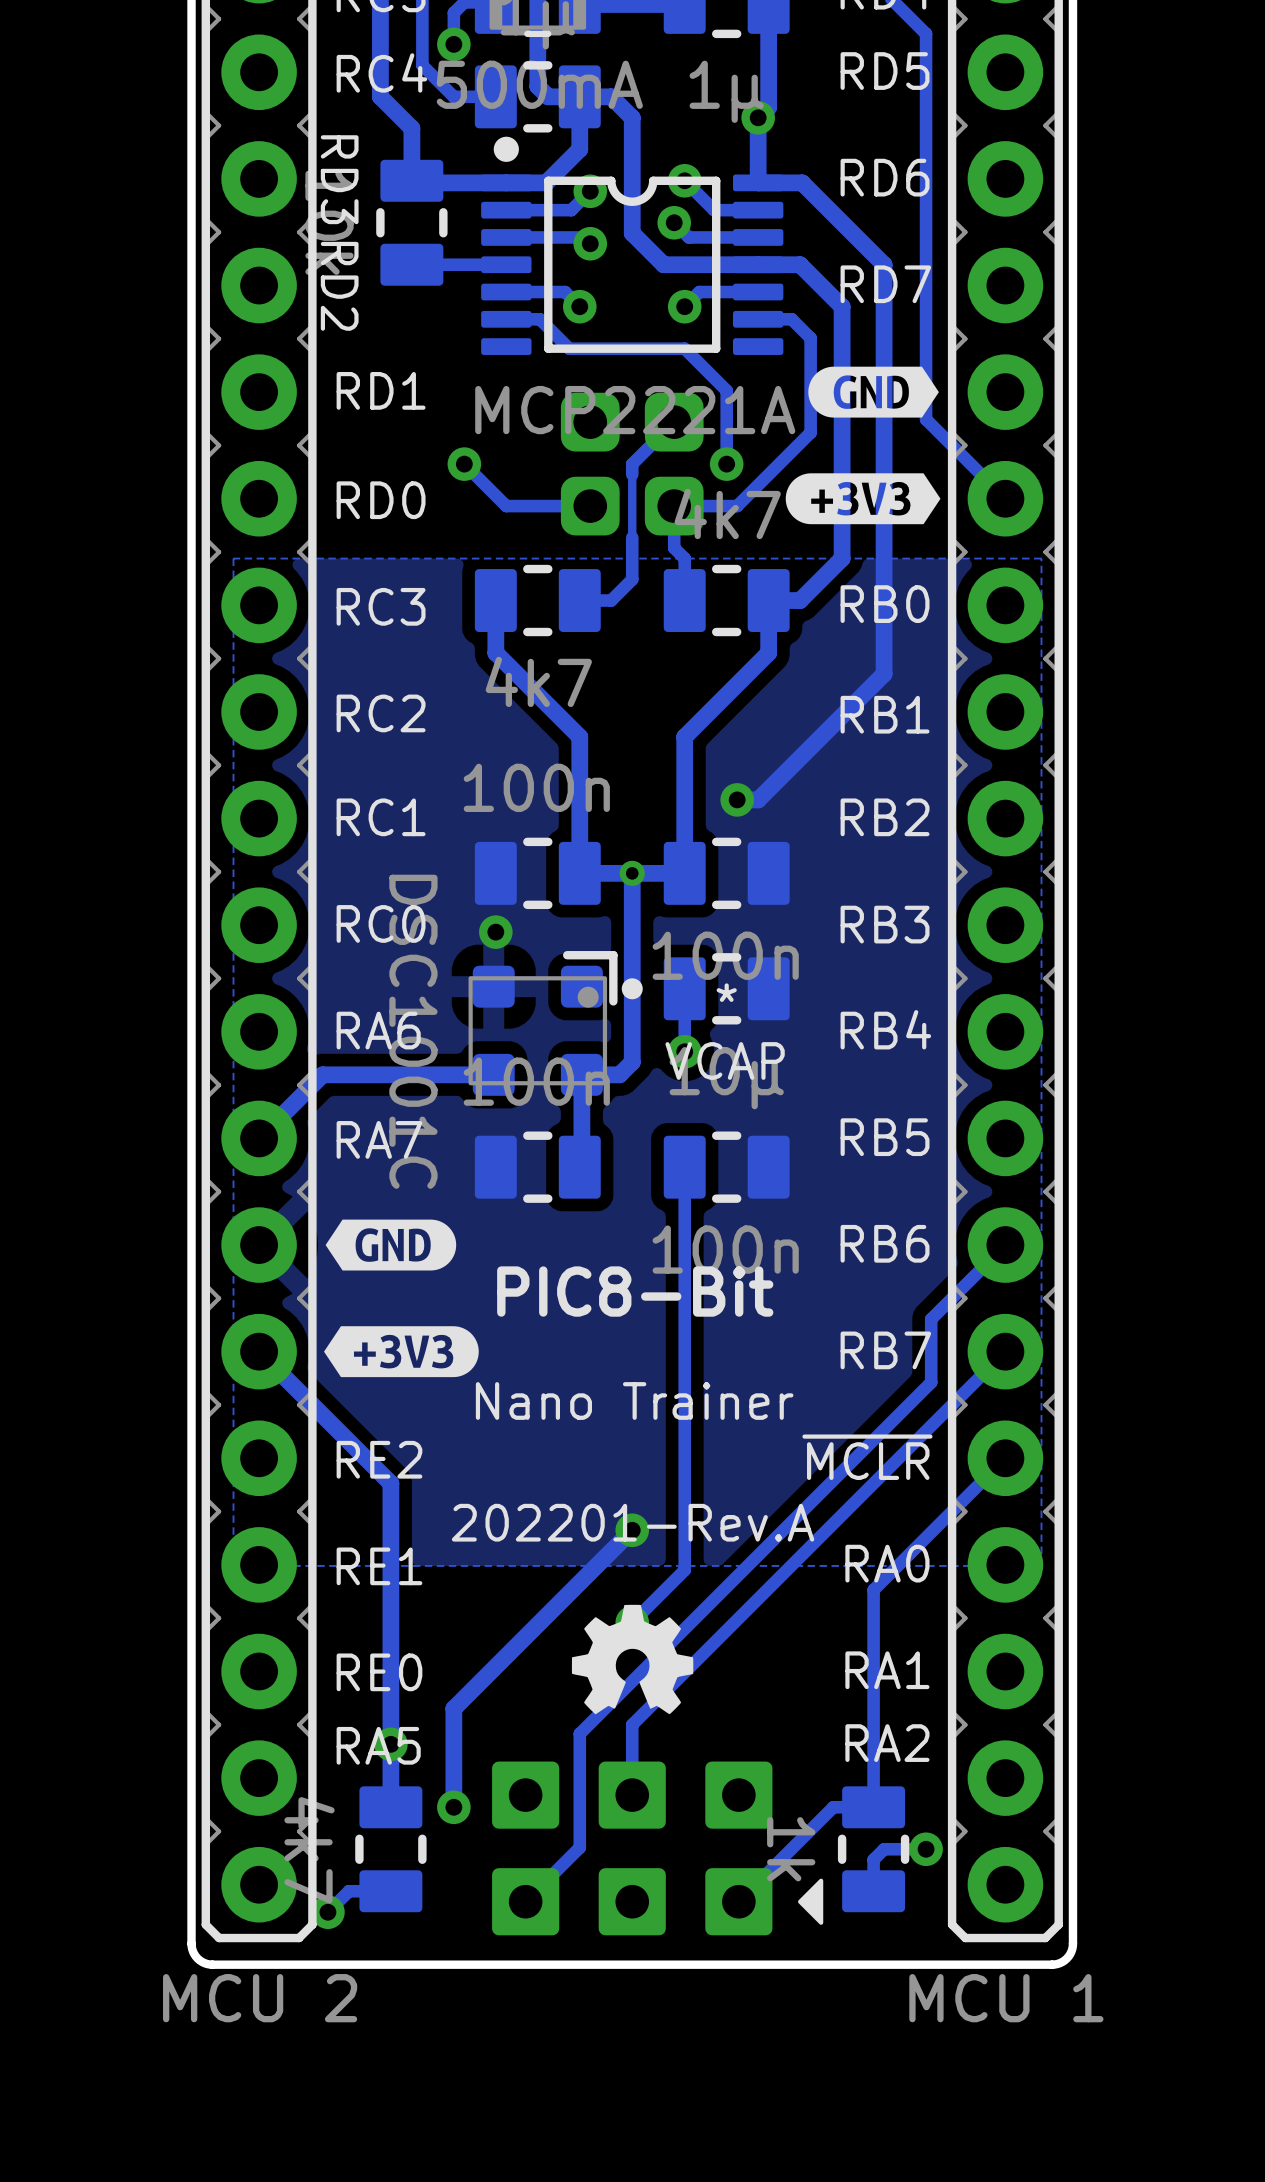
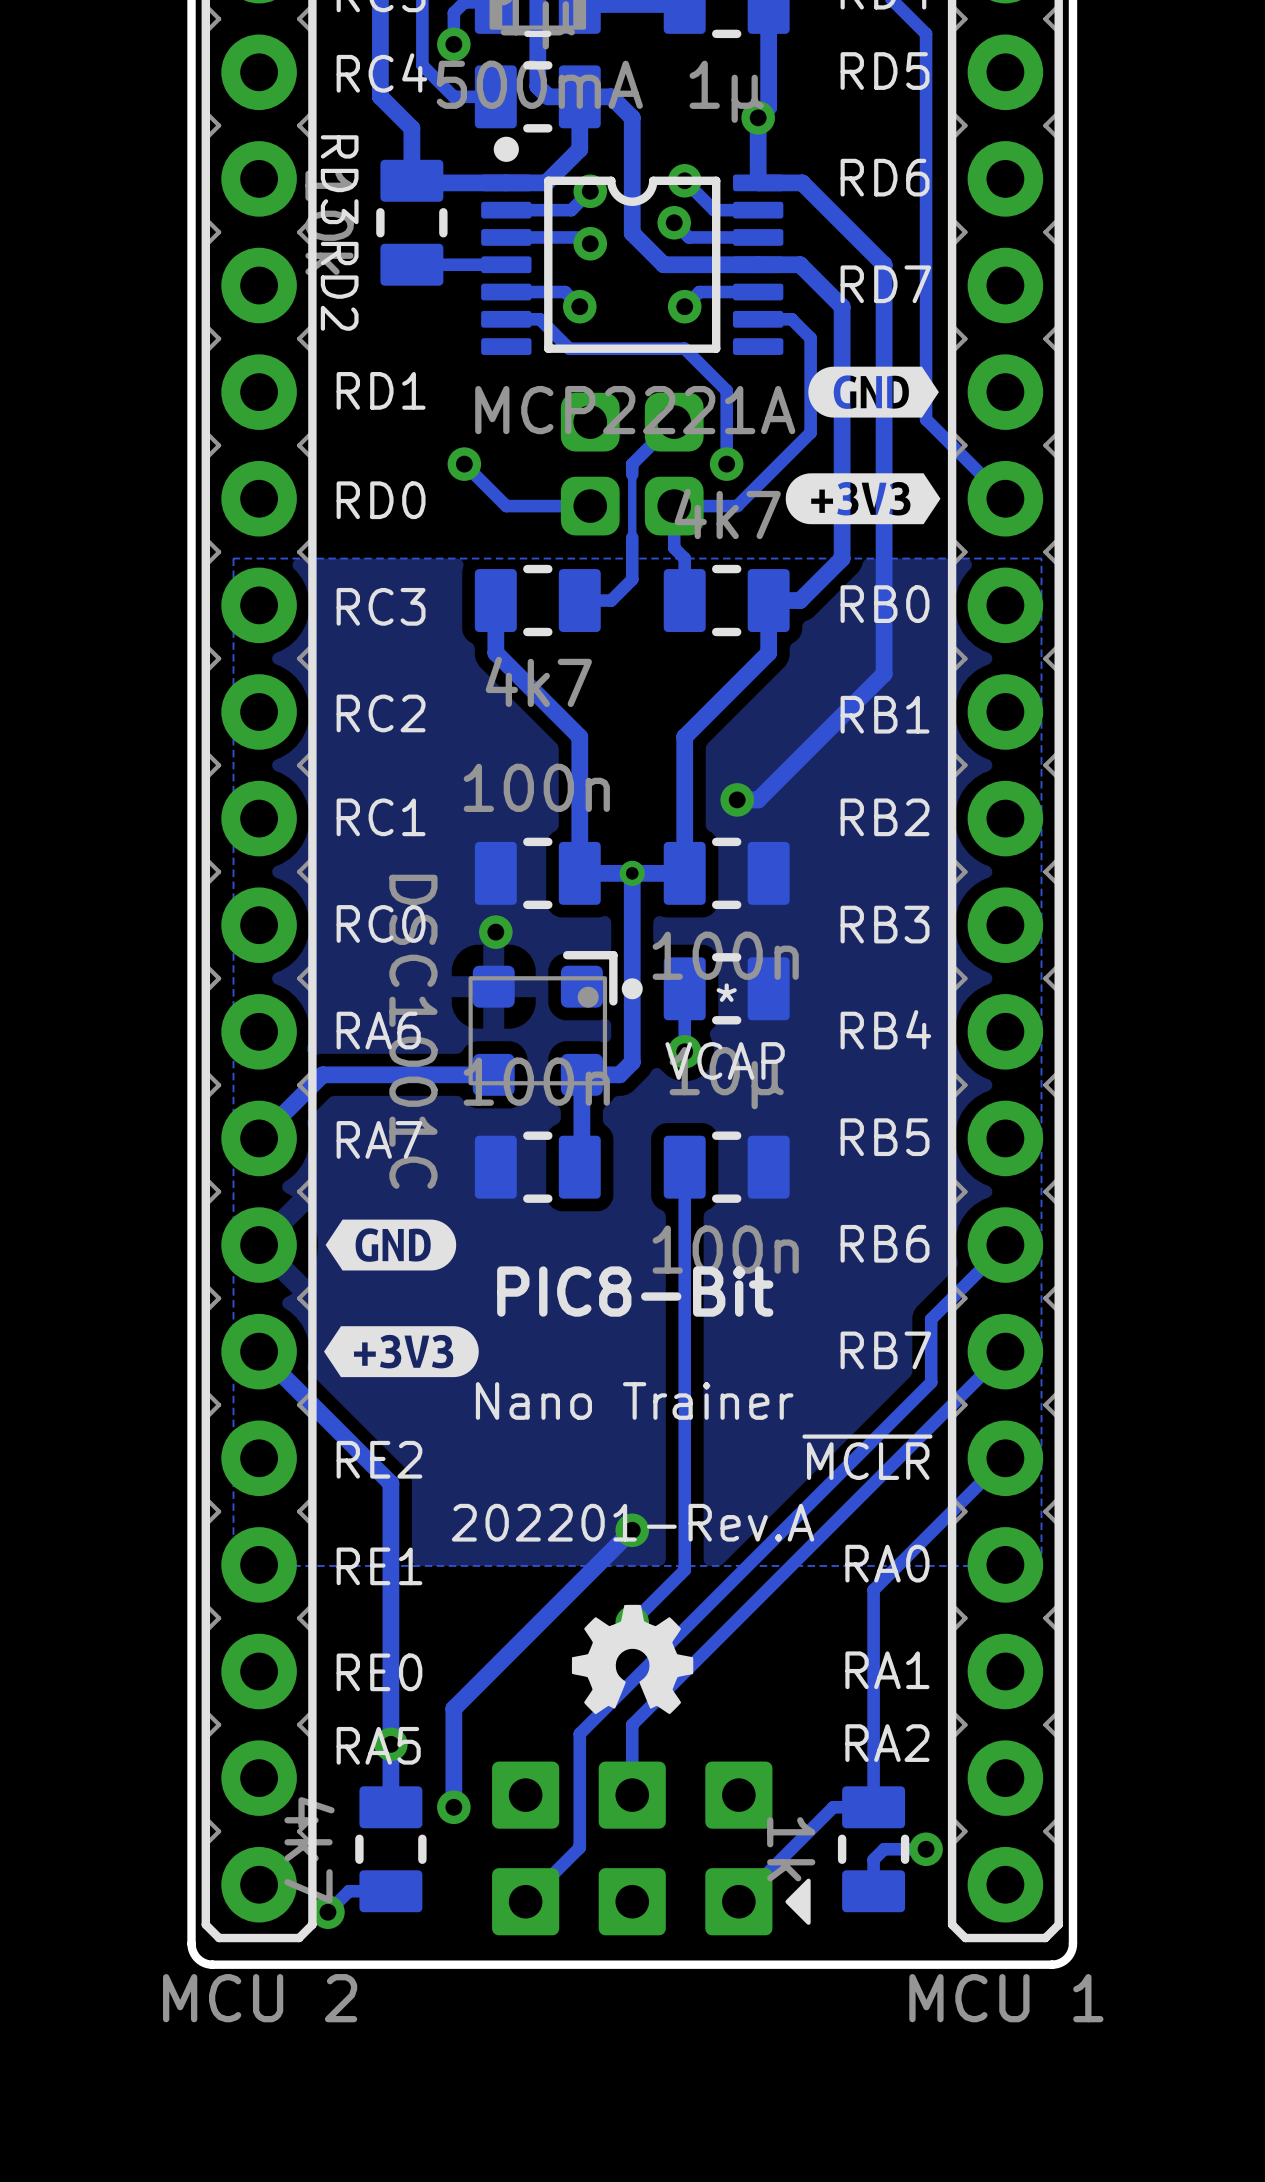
drawing position: (810, 1901) -> (798, 1901)

